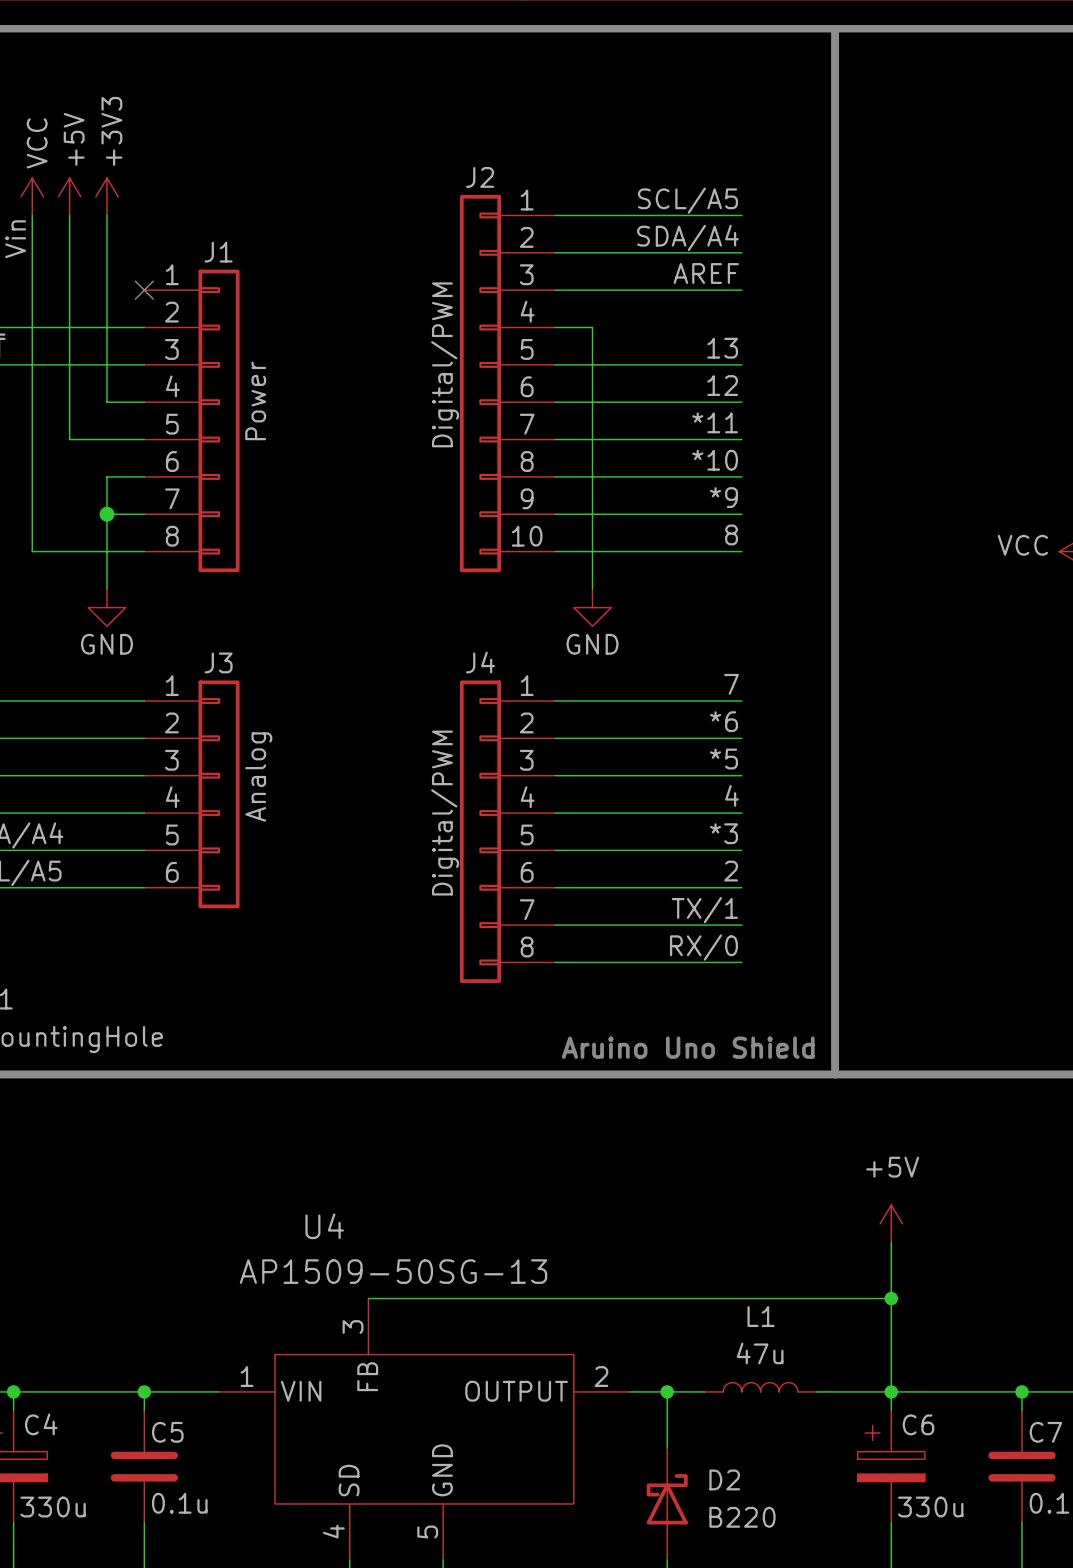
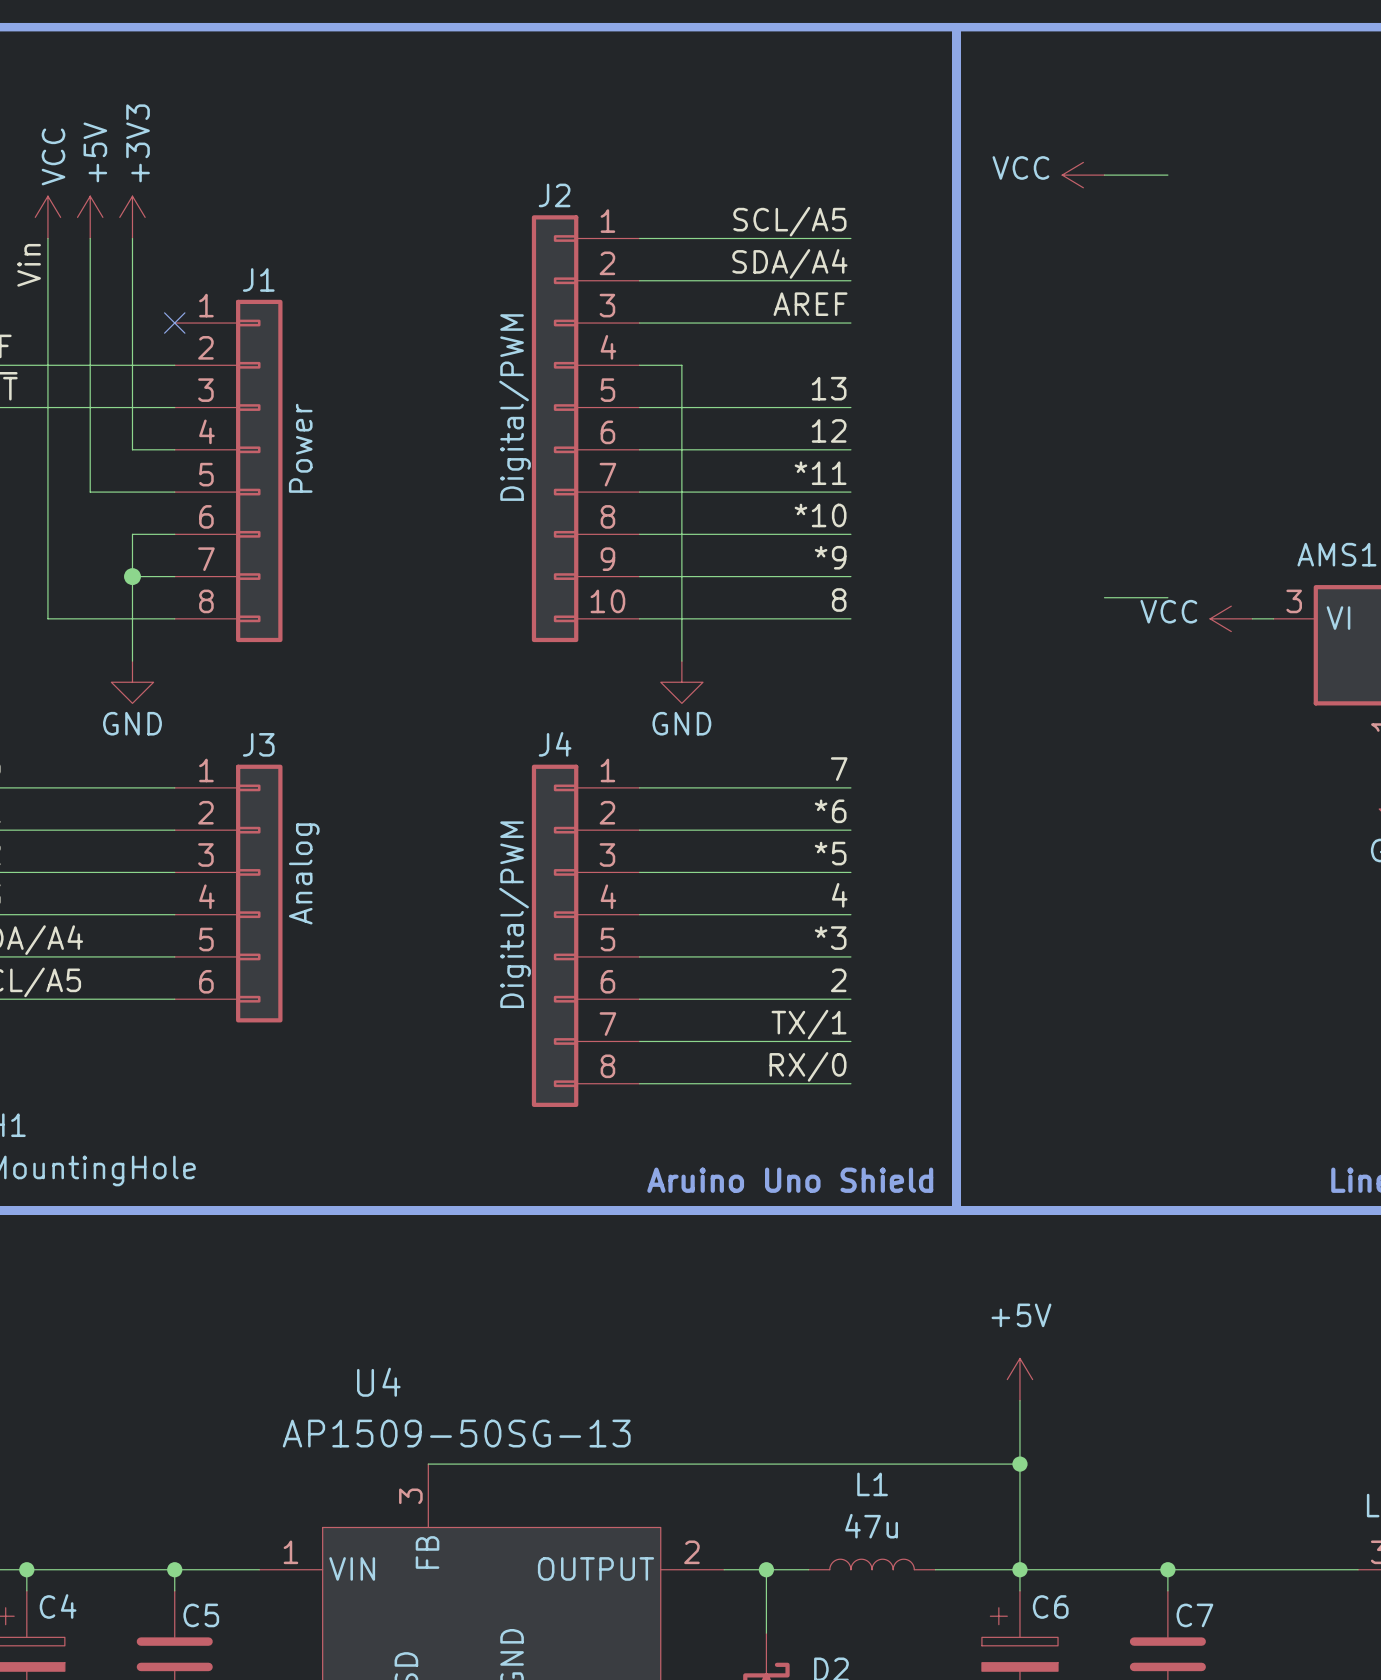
power symbol: none -> VCC (1083, 175)
wire: none -> (1104, 175) (1167, 175)
wire: none -> (1104, 597) (1167, 597)

